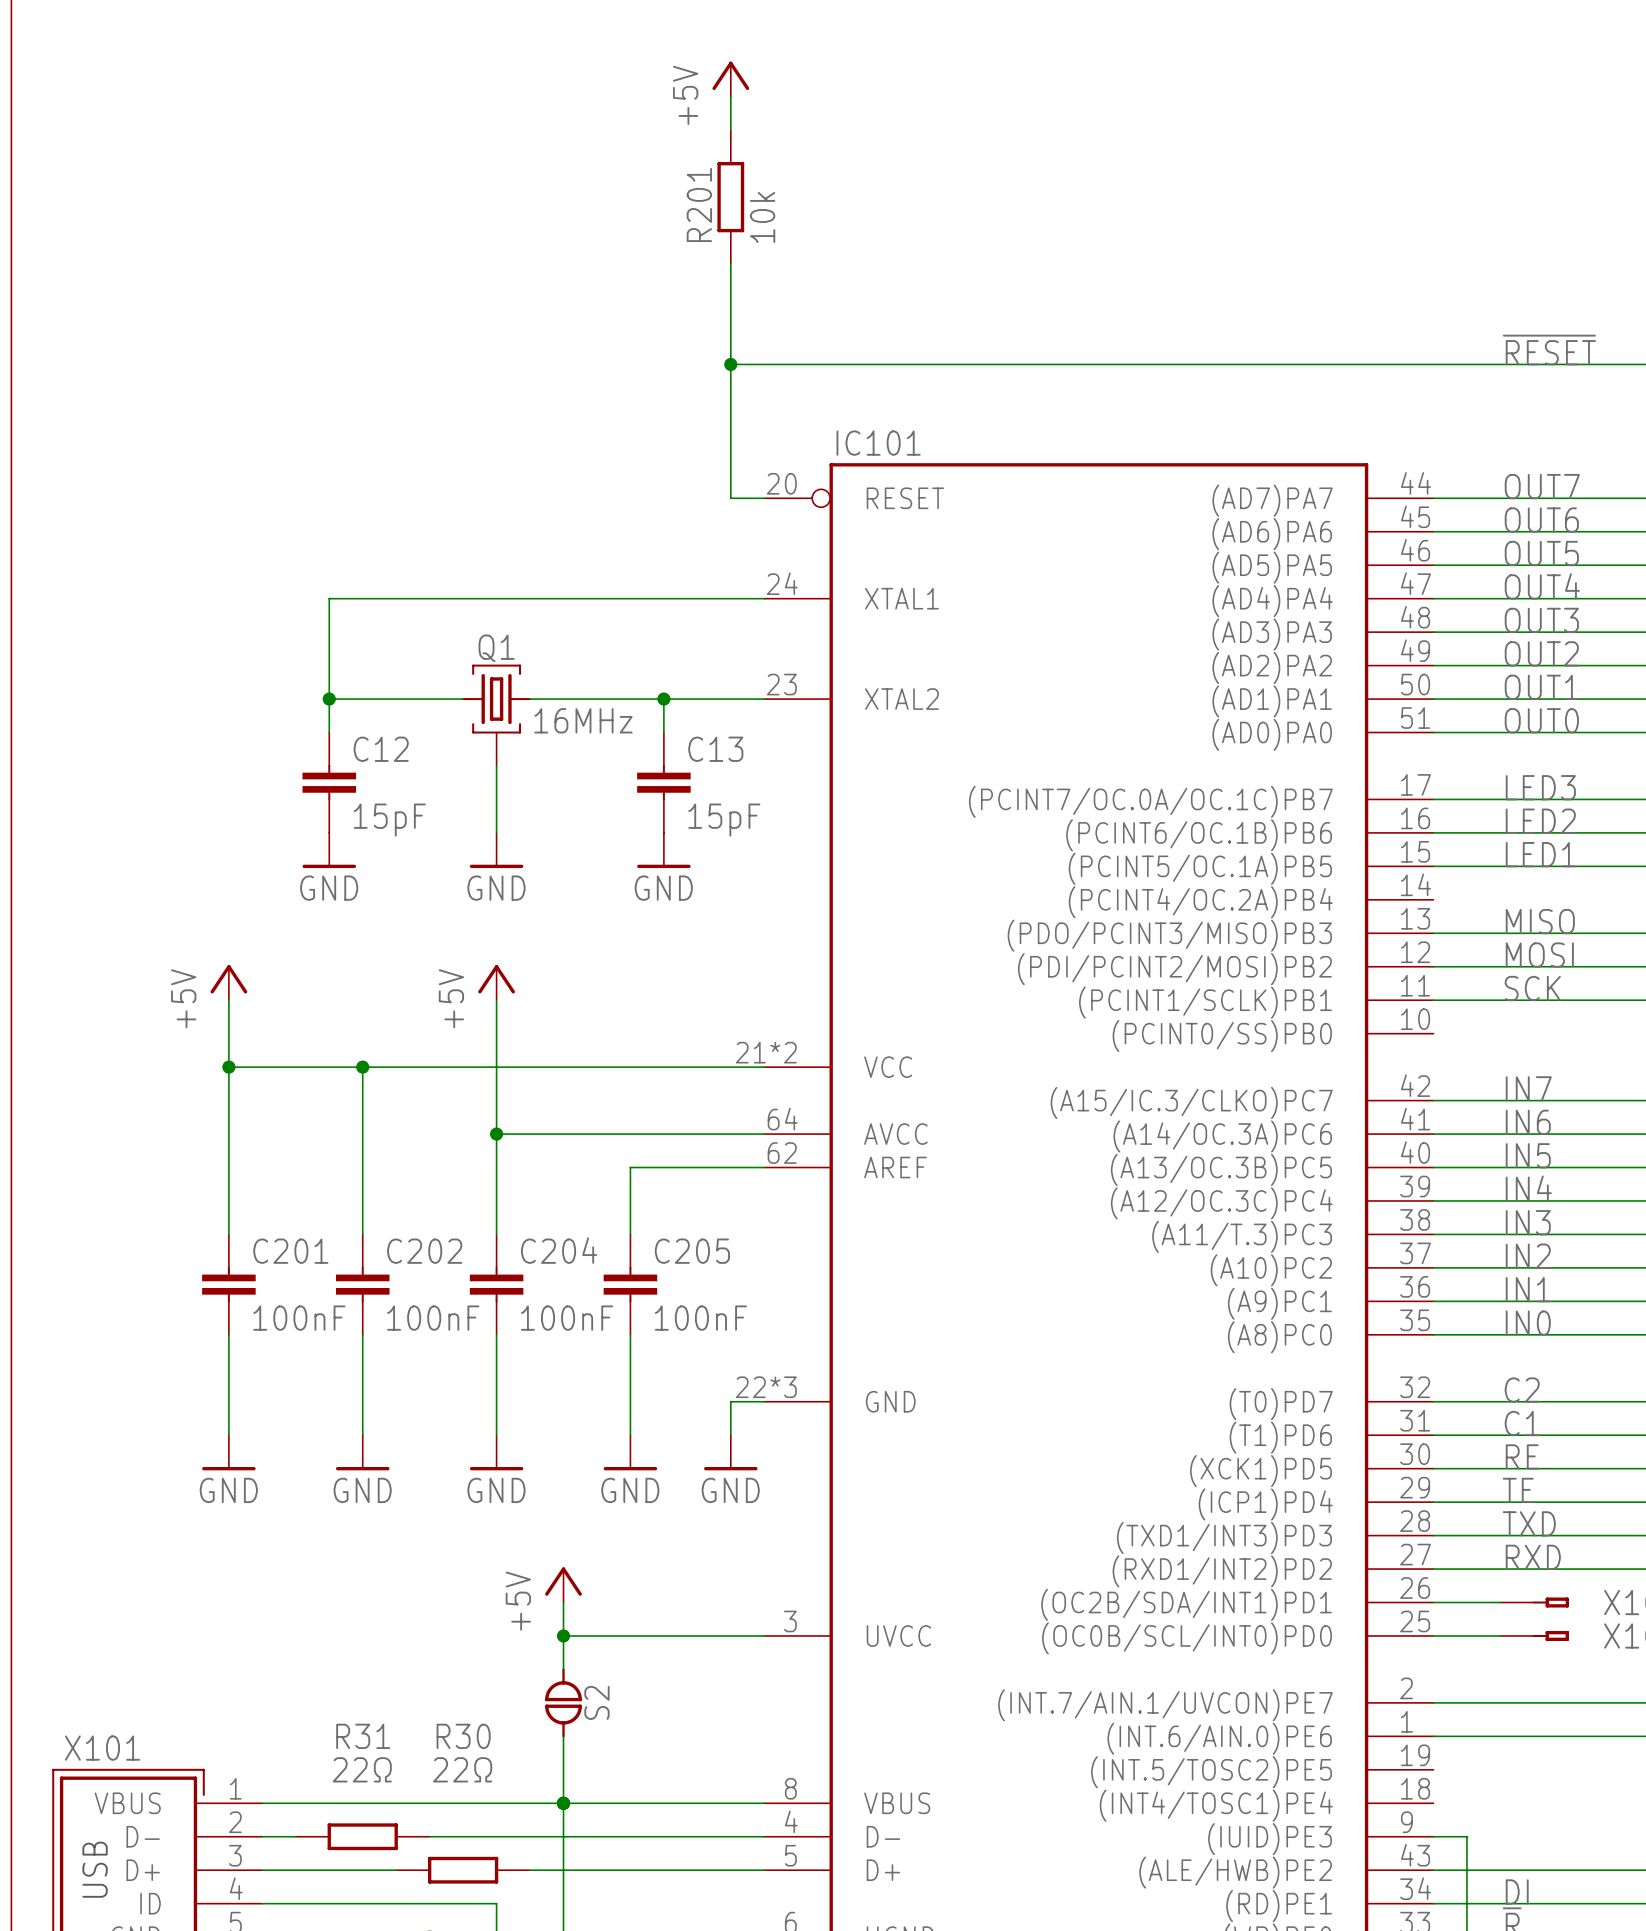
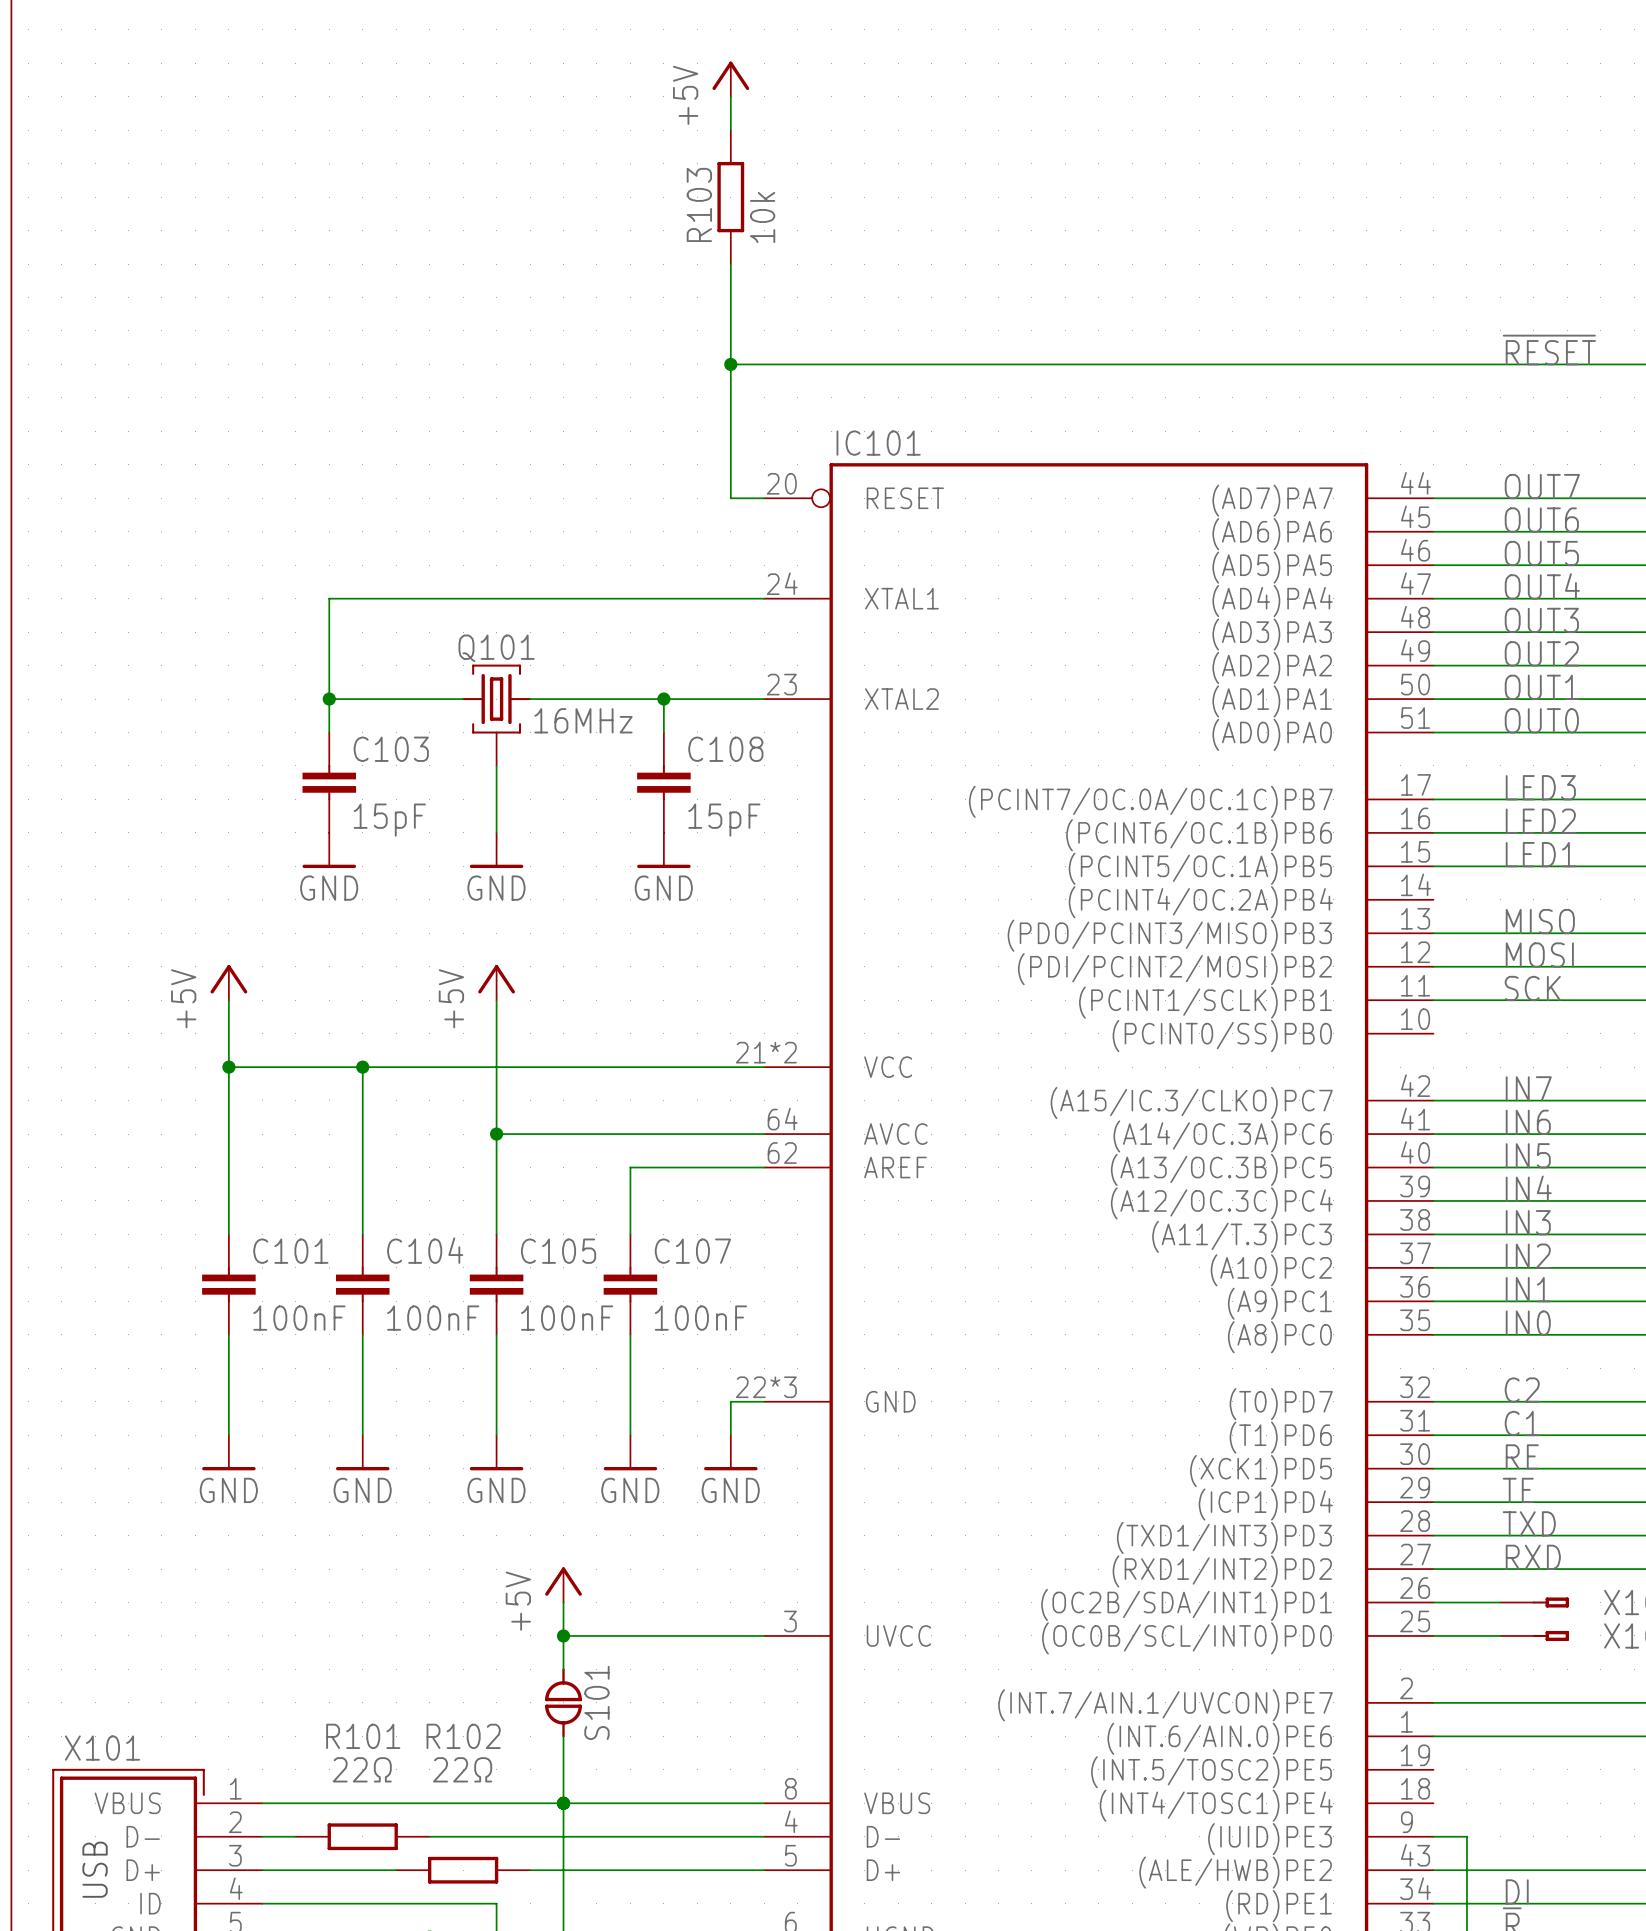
R201 name: R201 (699, 204) -> R103 (699, 204)
Q1 name: Q1 (496, 648) -> Q101 (496, 648)
C12 name: C12 (381, 749) -> C103 (391, 749)
C13 name: C13 (715, 749) -> C108 (725, 749)
C204 name: C204 (559, 1250) -> C105 (558, 1251)
C201 name: C201 (290, 1251) -> C101 (290, 1251)
C202 name: C202 (424, 1251) -> C104 (425, 1250)
C205 name: C205 (692, 1251) -> C107 (692, 1251)
S2 name: S2 (596, 1702) -> S101 (596, 1702)
R31 name: R31 (363, 1736) -> R101 (363, 1736)
R30 name: R30 (463, 1736) -> R102 (463, 1736)

